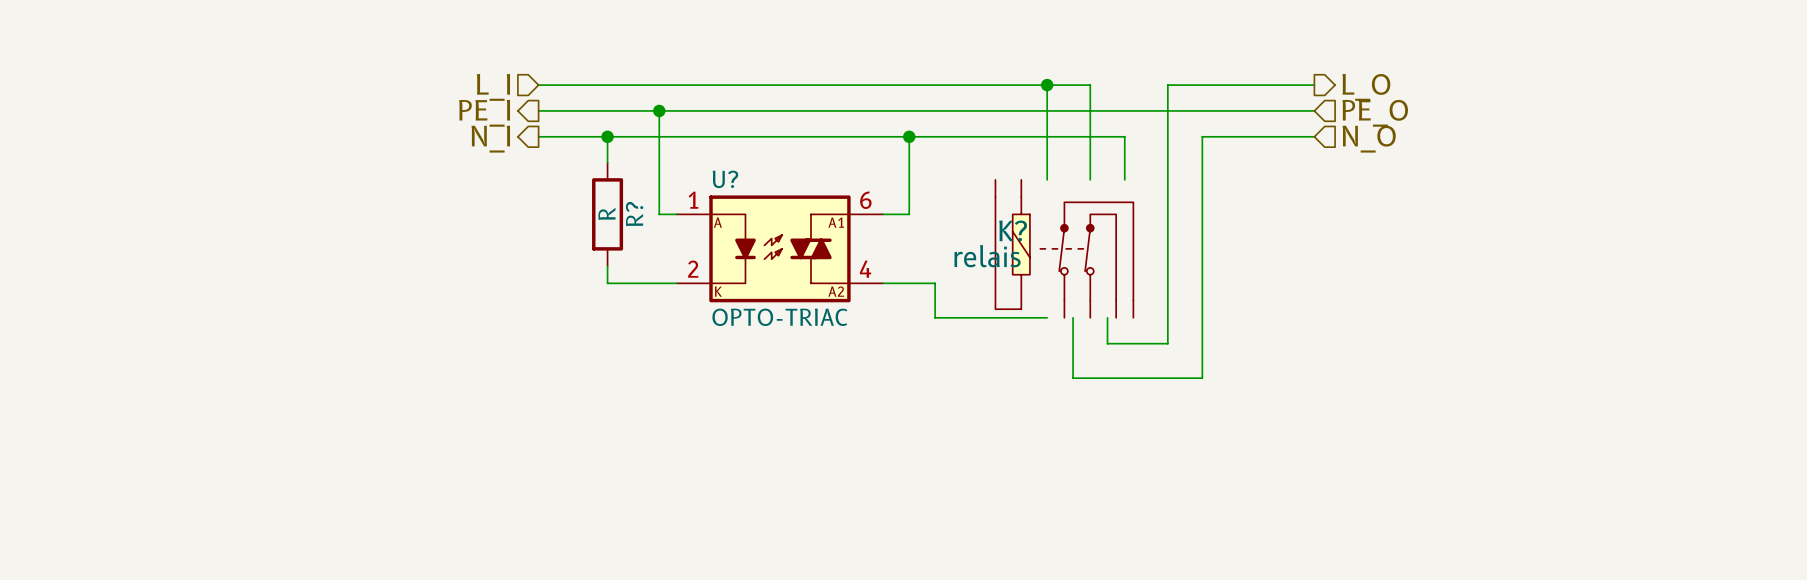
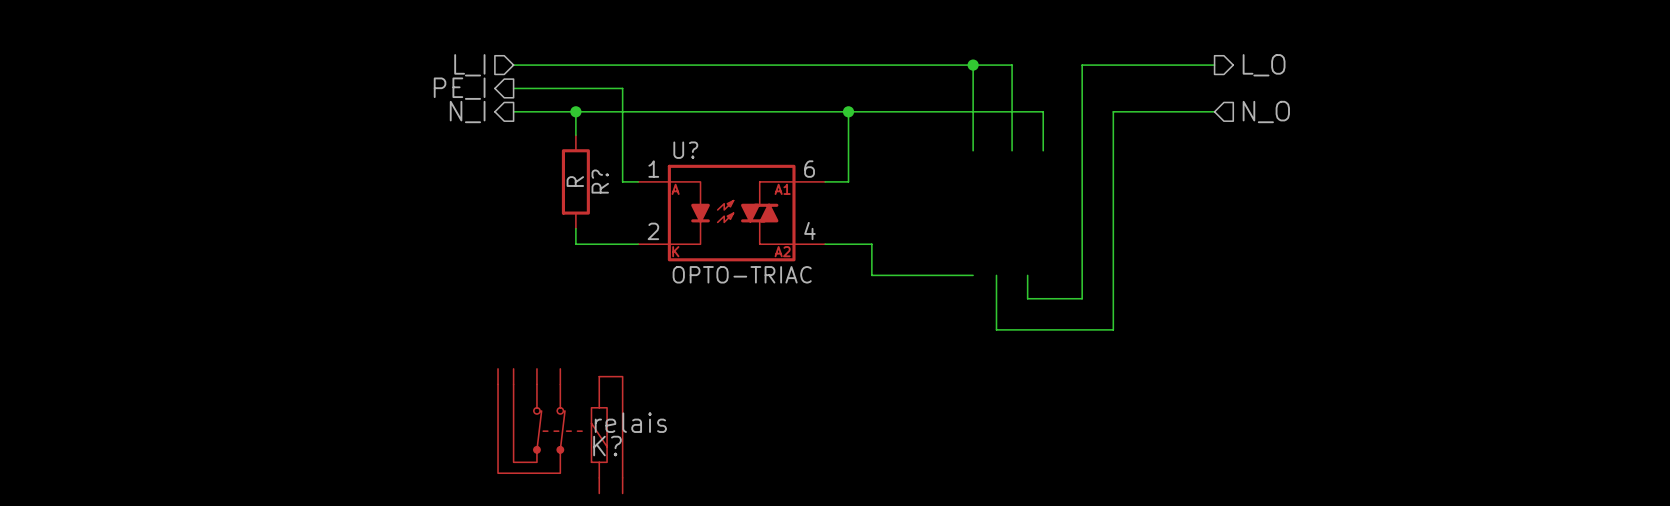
wire: (659, 110) (1314, 110) -> none
junction: (659, 110) -> none
hierarchical label: PE_O (1375, 113) -> none
K?: relais (1064, 248) -> none
K?: none -> relais (560, 431)

